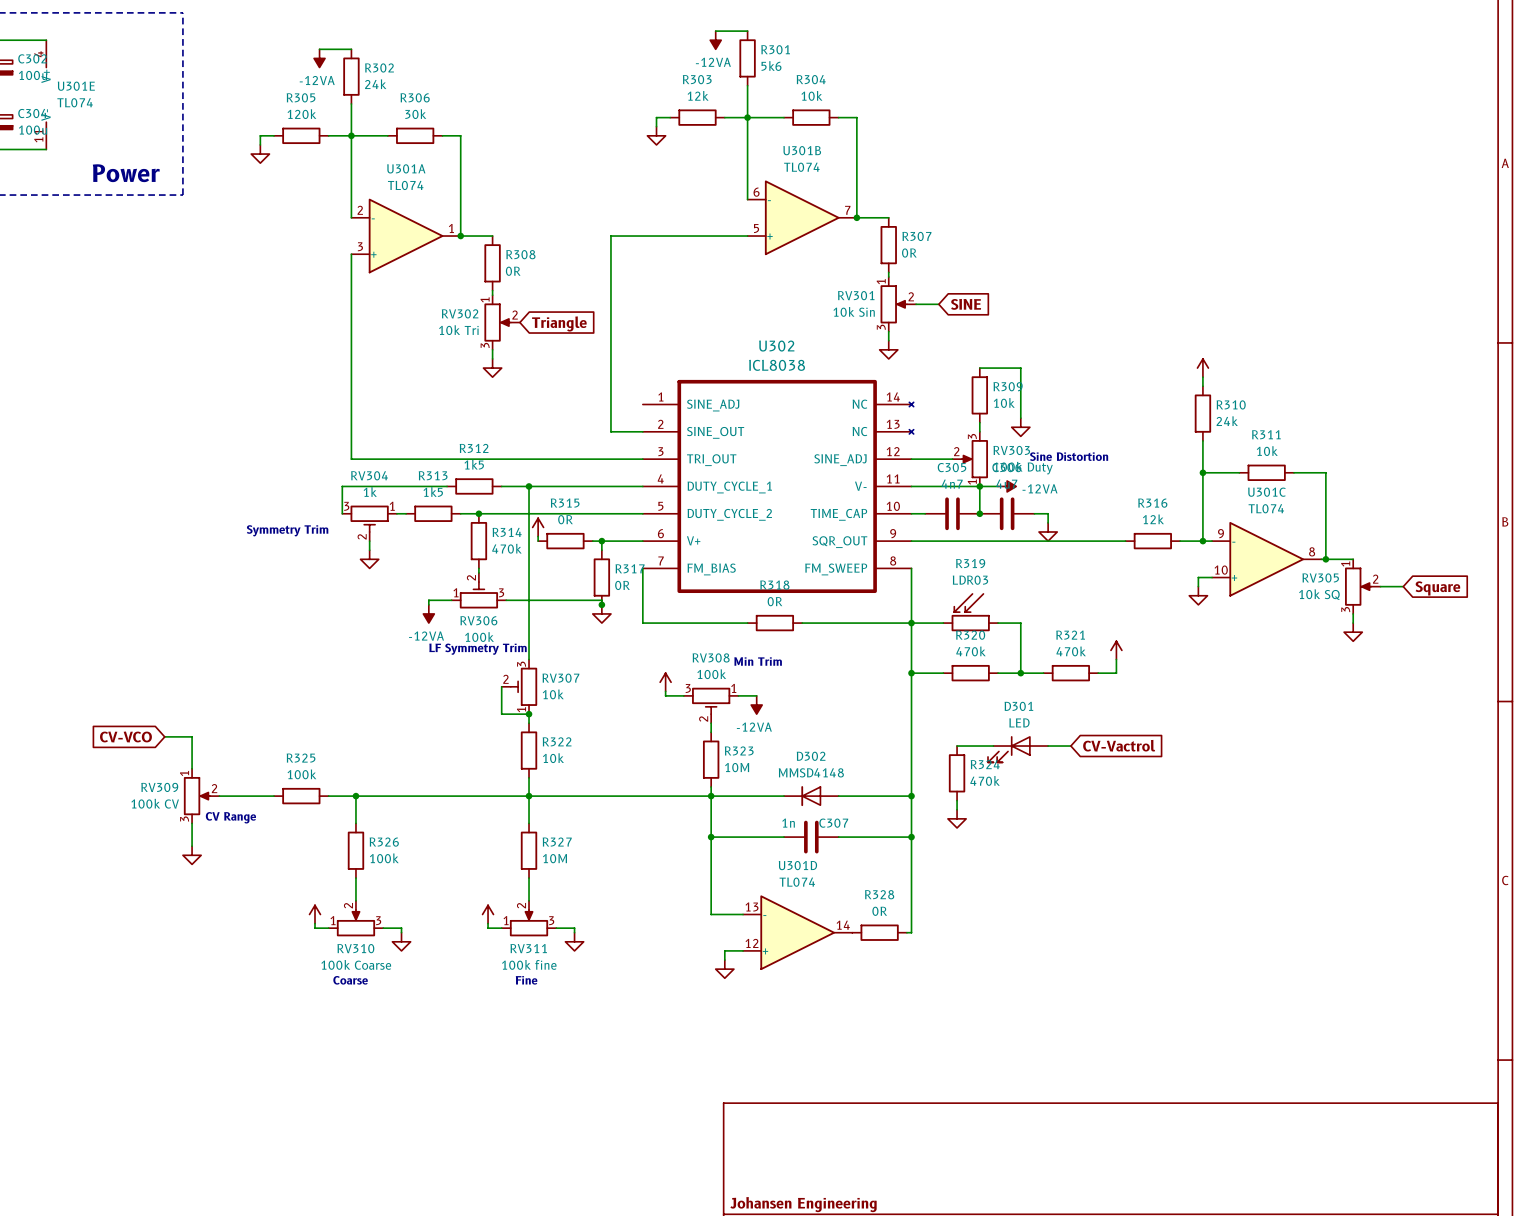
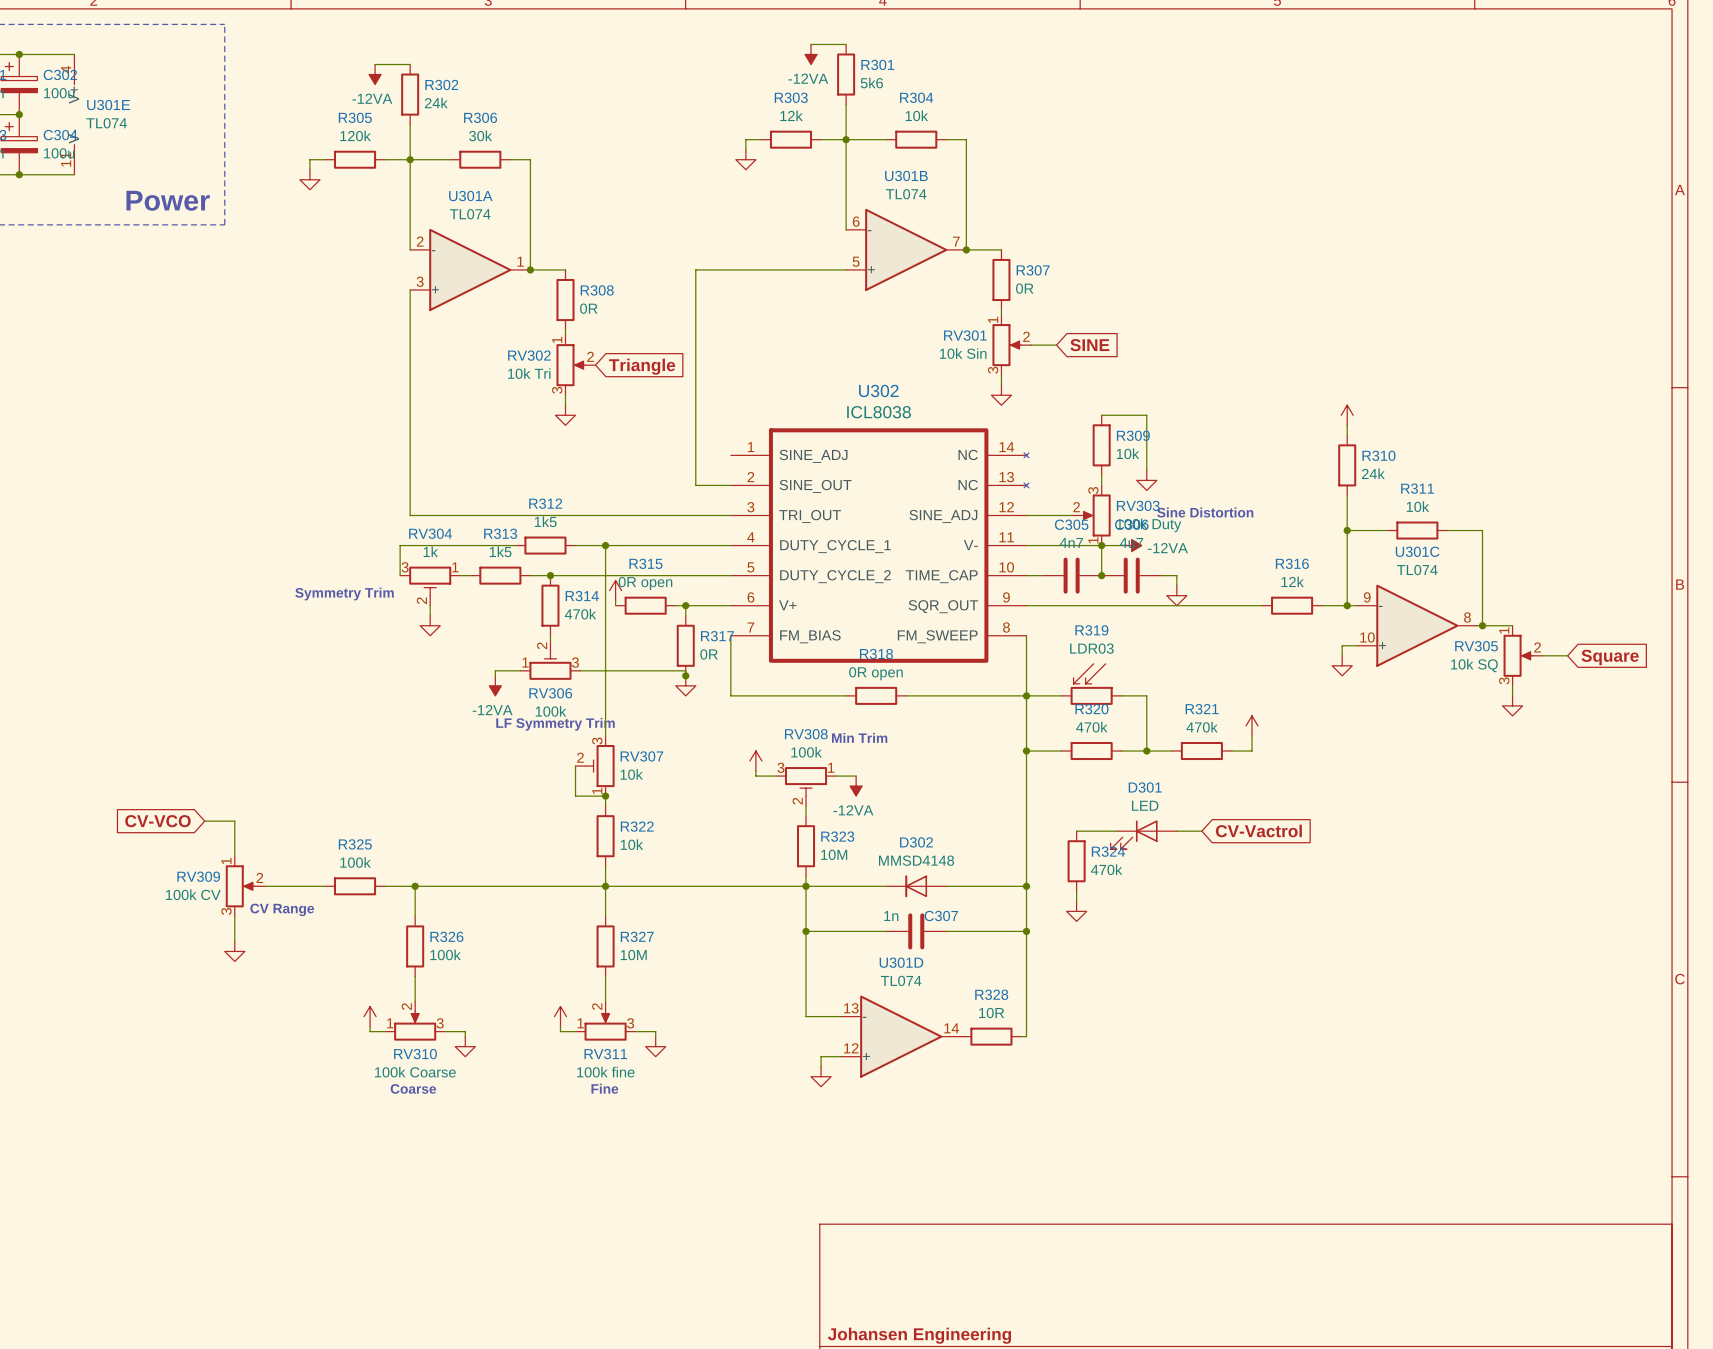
R315 value: 0R (565, 519) -> 0R open (645, 583)
R318 value: 0R (774, 601) -> 0R open (875, 673)
R328 value: 0R (879, 911) -> 10R (991, 1013)

